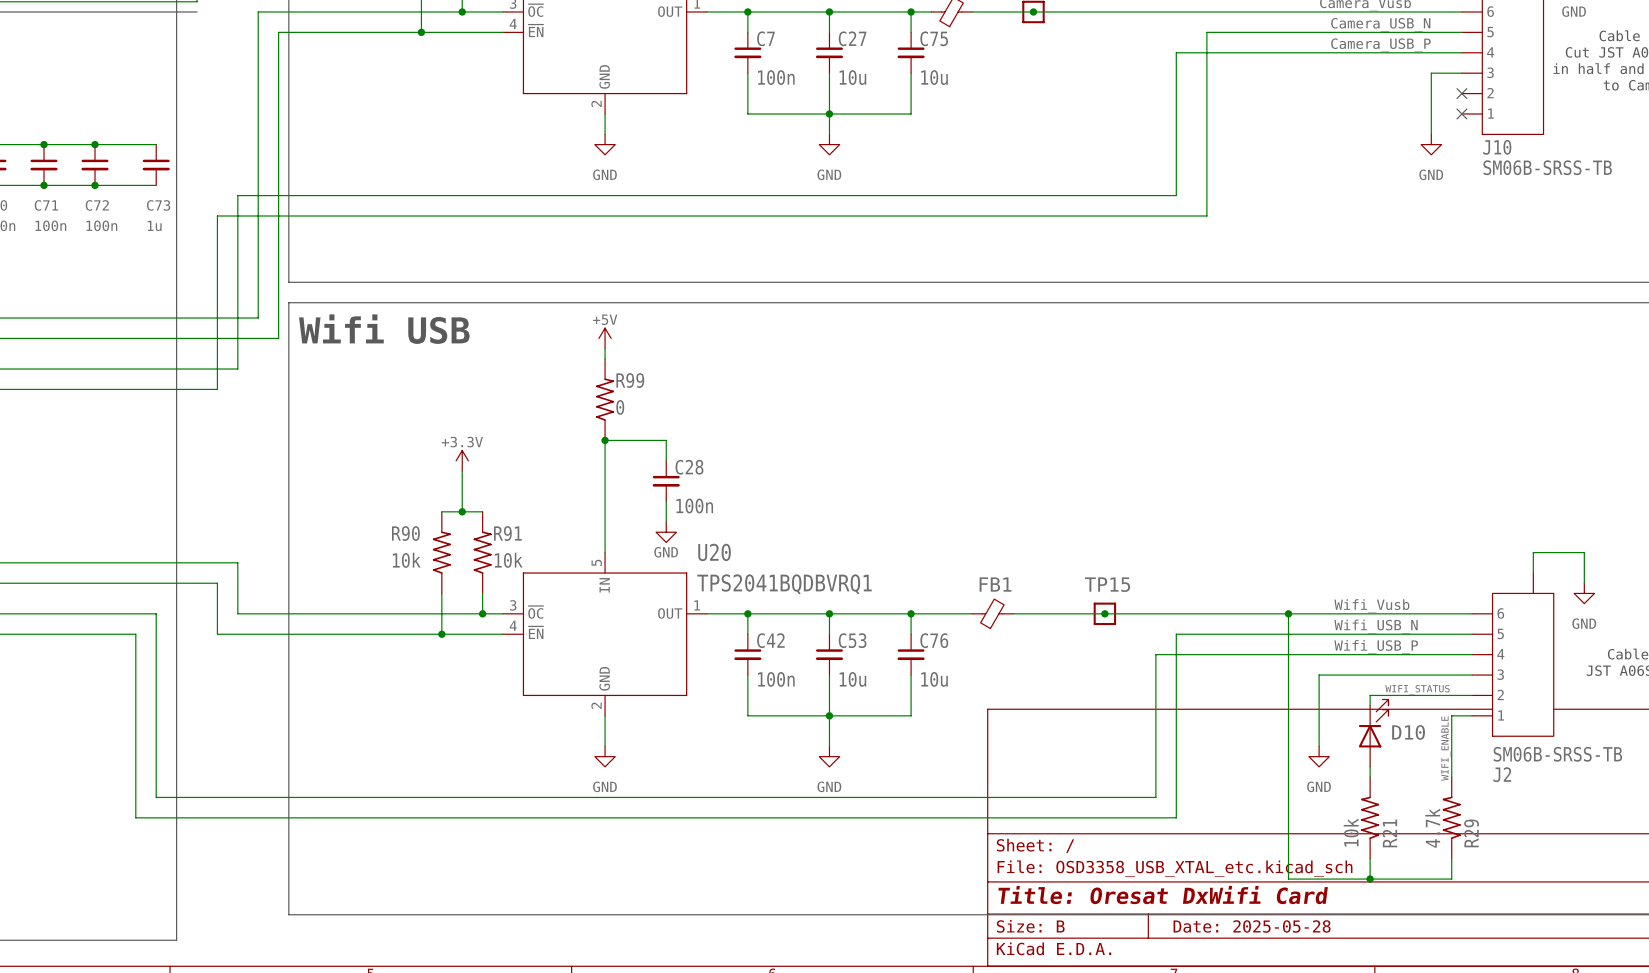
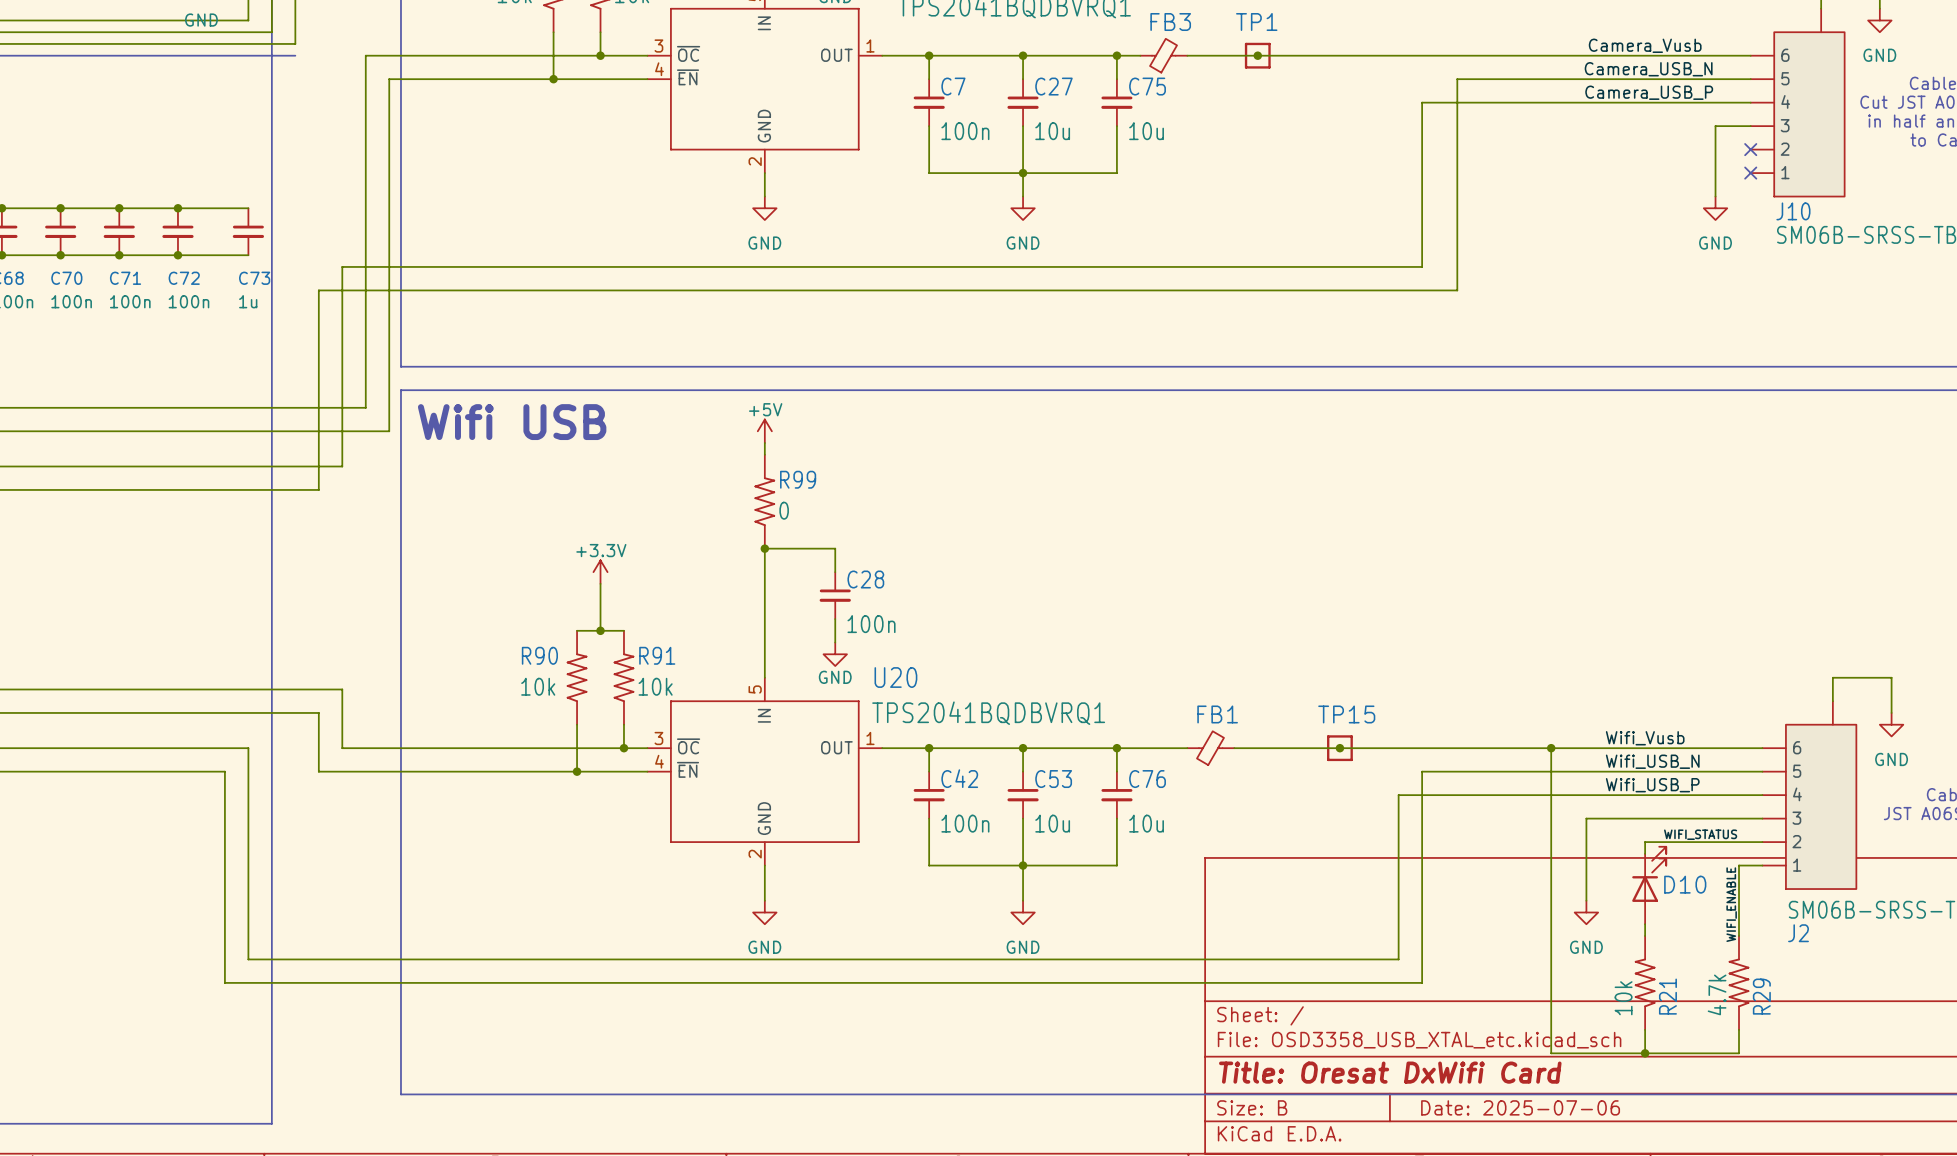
title block: Date: 2025-05-28 (1252, 926) -> Date: 2025-07-06 (1520, 1107)

